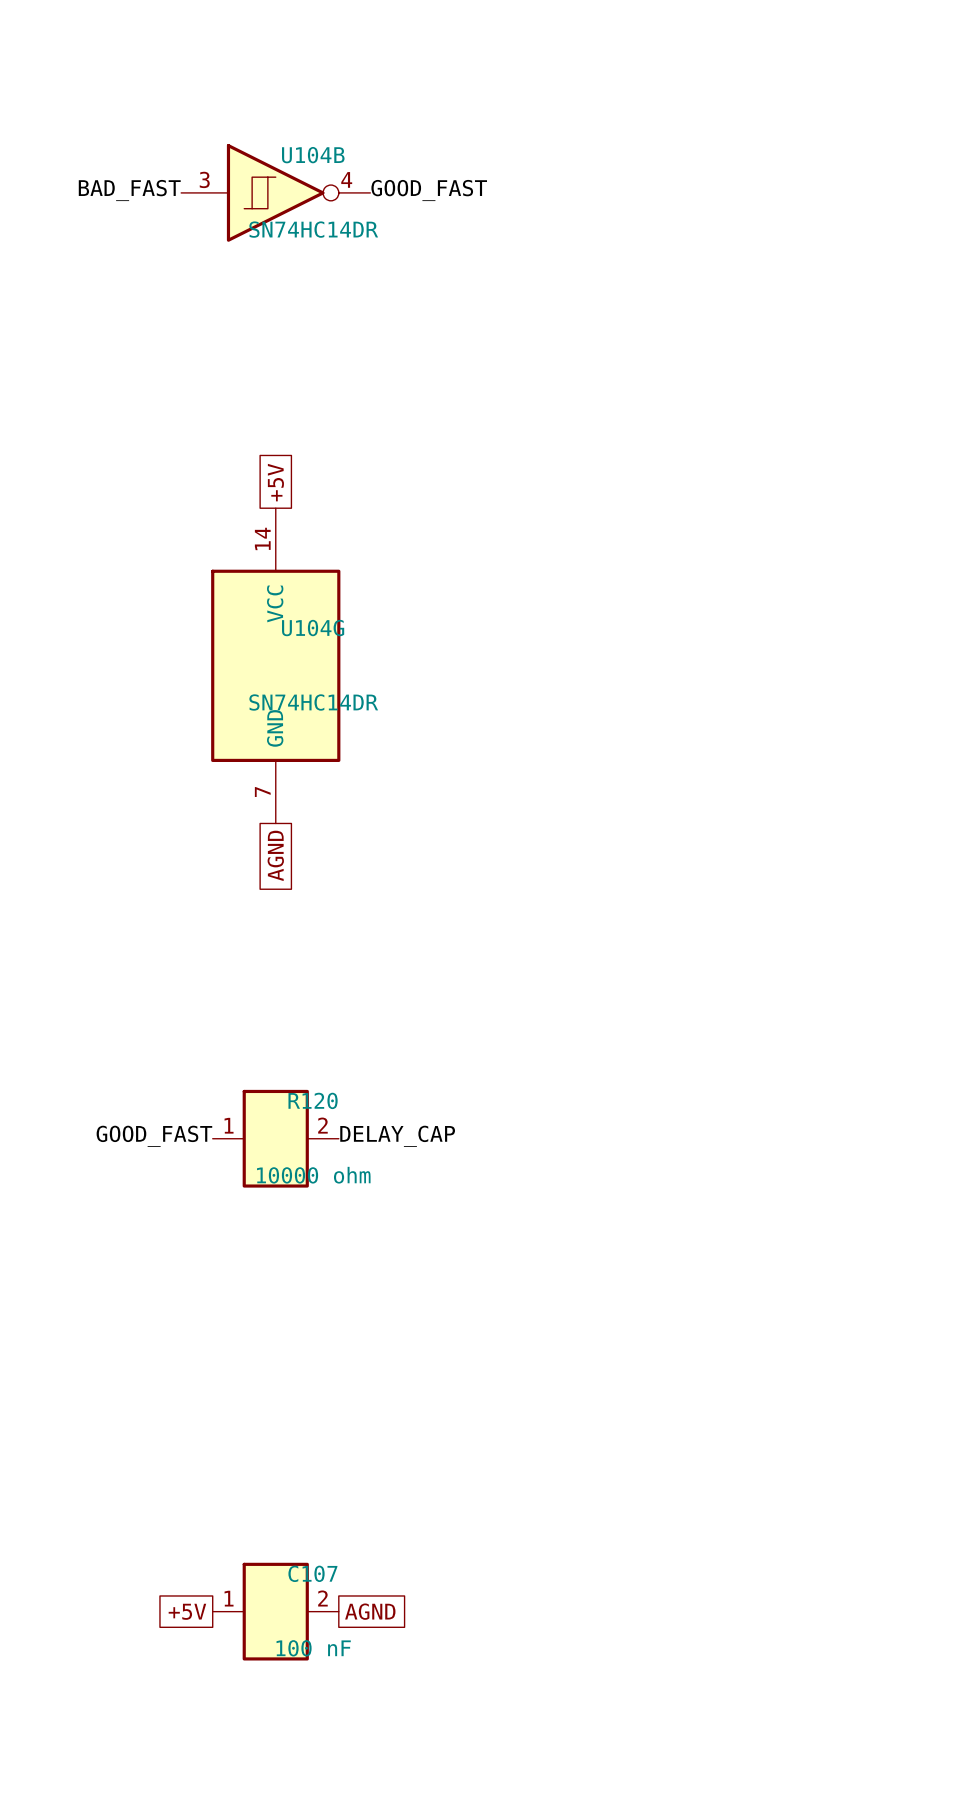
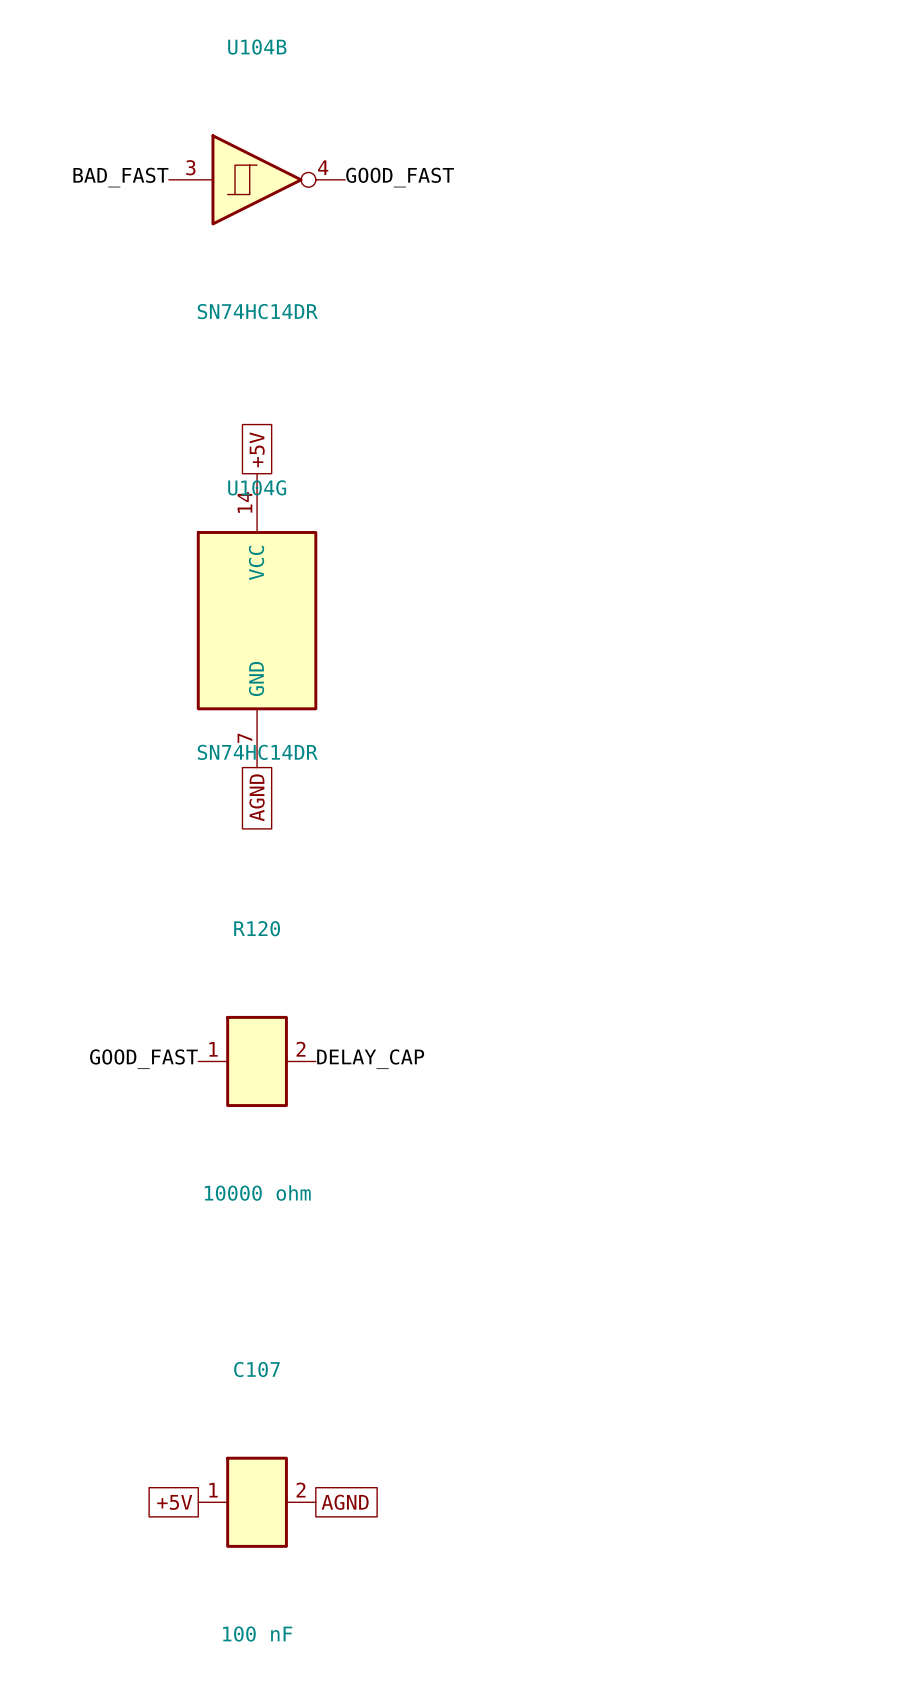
U104B name position: U104B (313, 155) -> U104B (257, 47)
U104B value position: SN74HC14DR (313, 229) -> SN74HC14DR (257, 311)
U104G name position: U104G (313, 628) -> U104G (257, 487)
U104G value position: SN74HC14DR (313, 702) -> SN74HC14DR (257, 752)
R120 name position: R120 (313, 1100) -> R120 (257, 928)
R120 value position: 10000 ohm (313, 1175) -> 10000 ohm (257, 1193)
C107 name position: C107 (312, 1573) -> C107 (256, 1369)
C107 value position: 100 nF (313, 1648) -> 100 nF (257, 1634)

